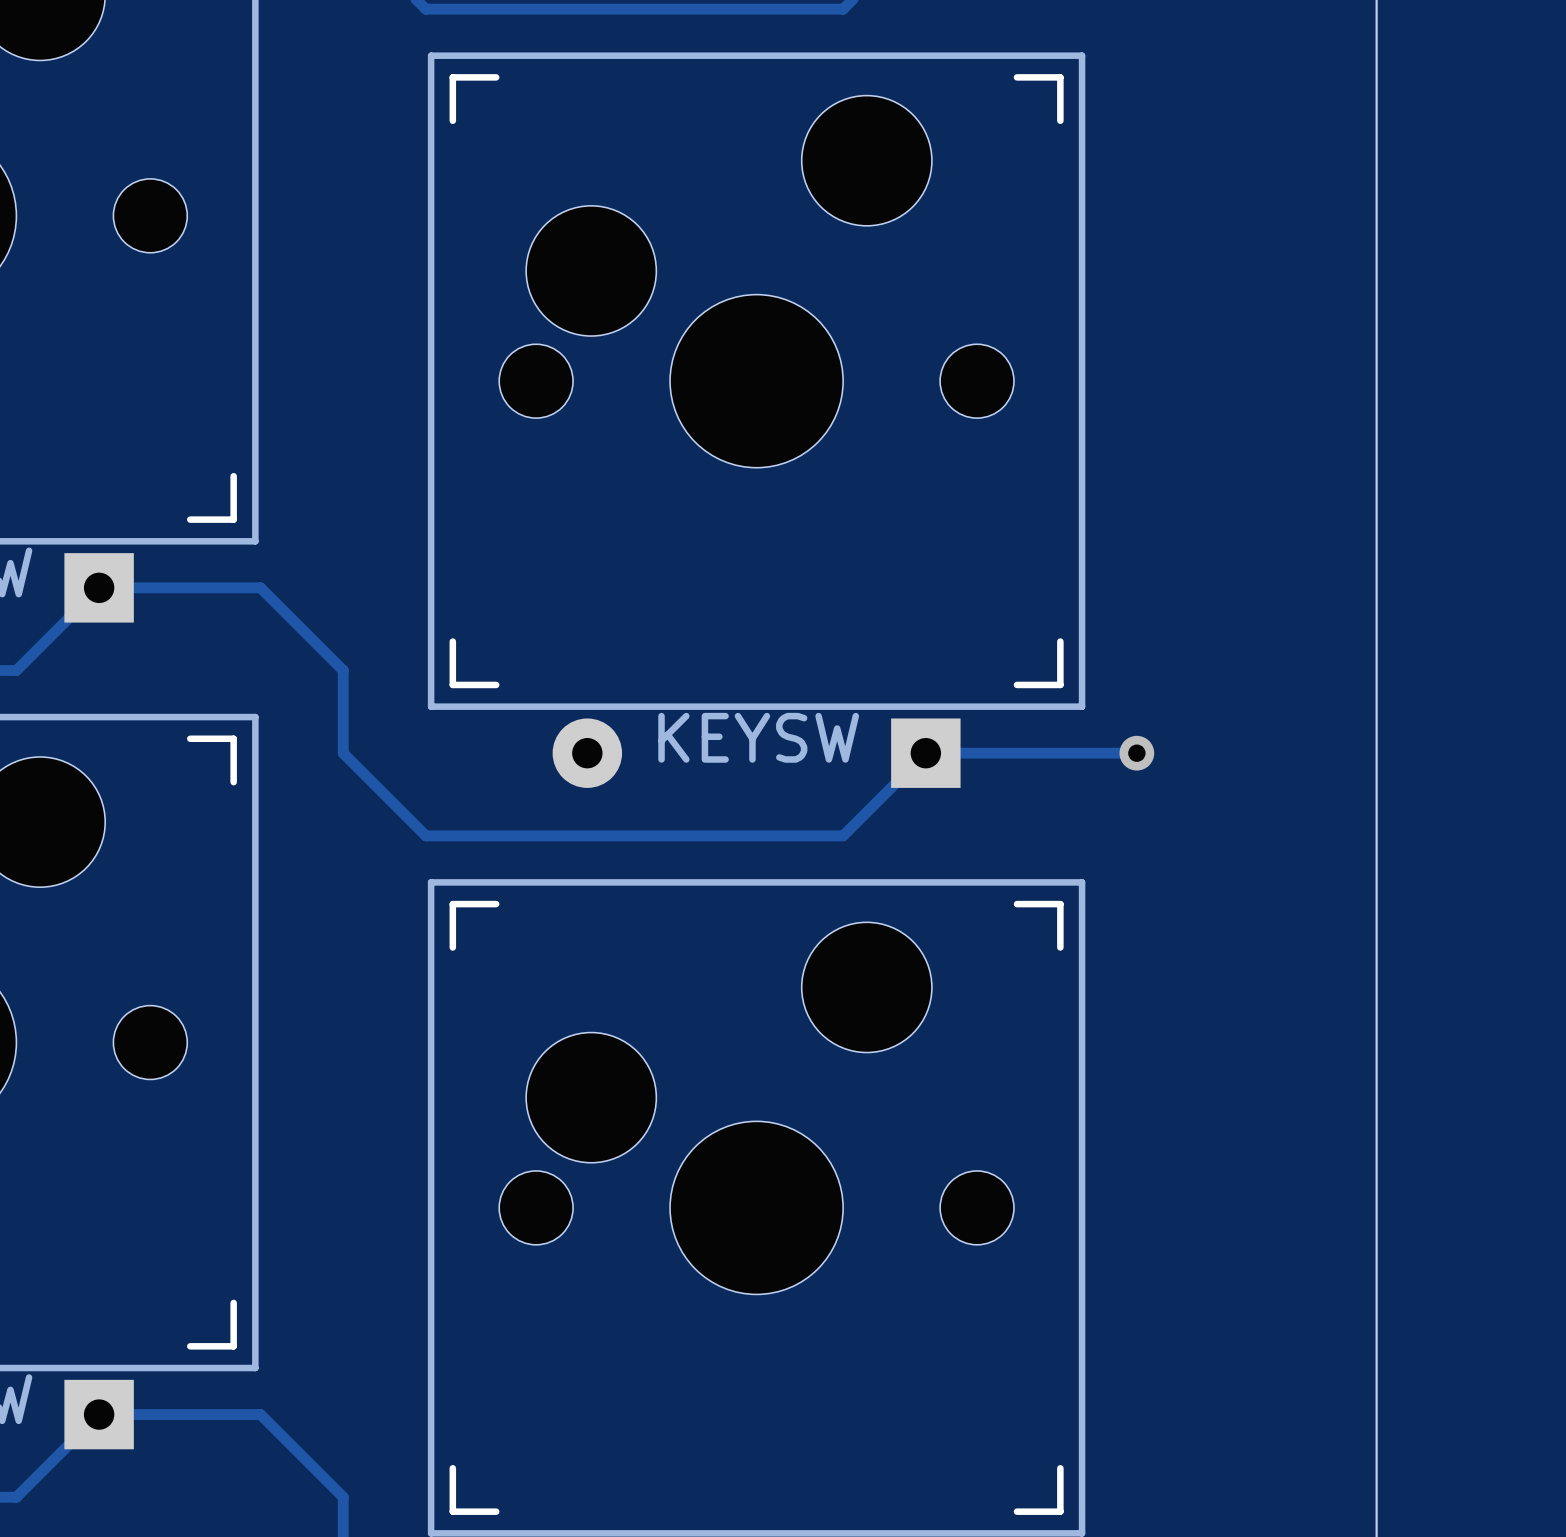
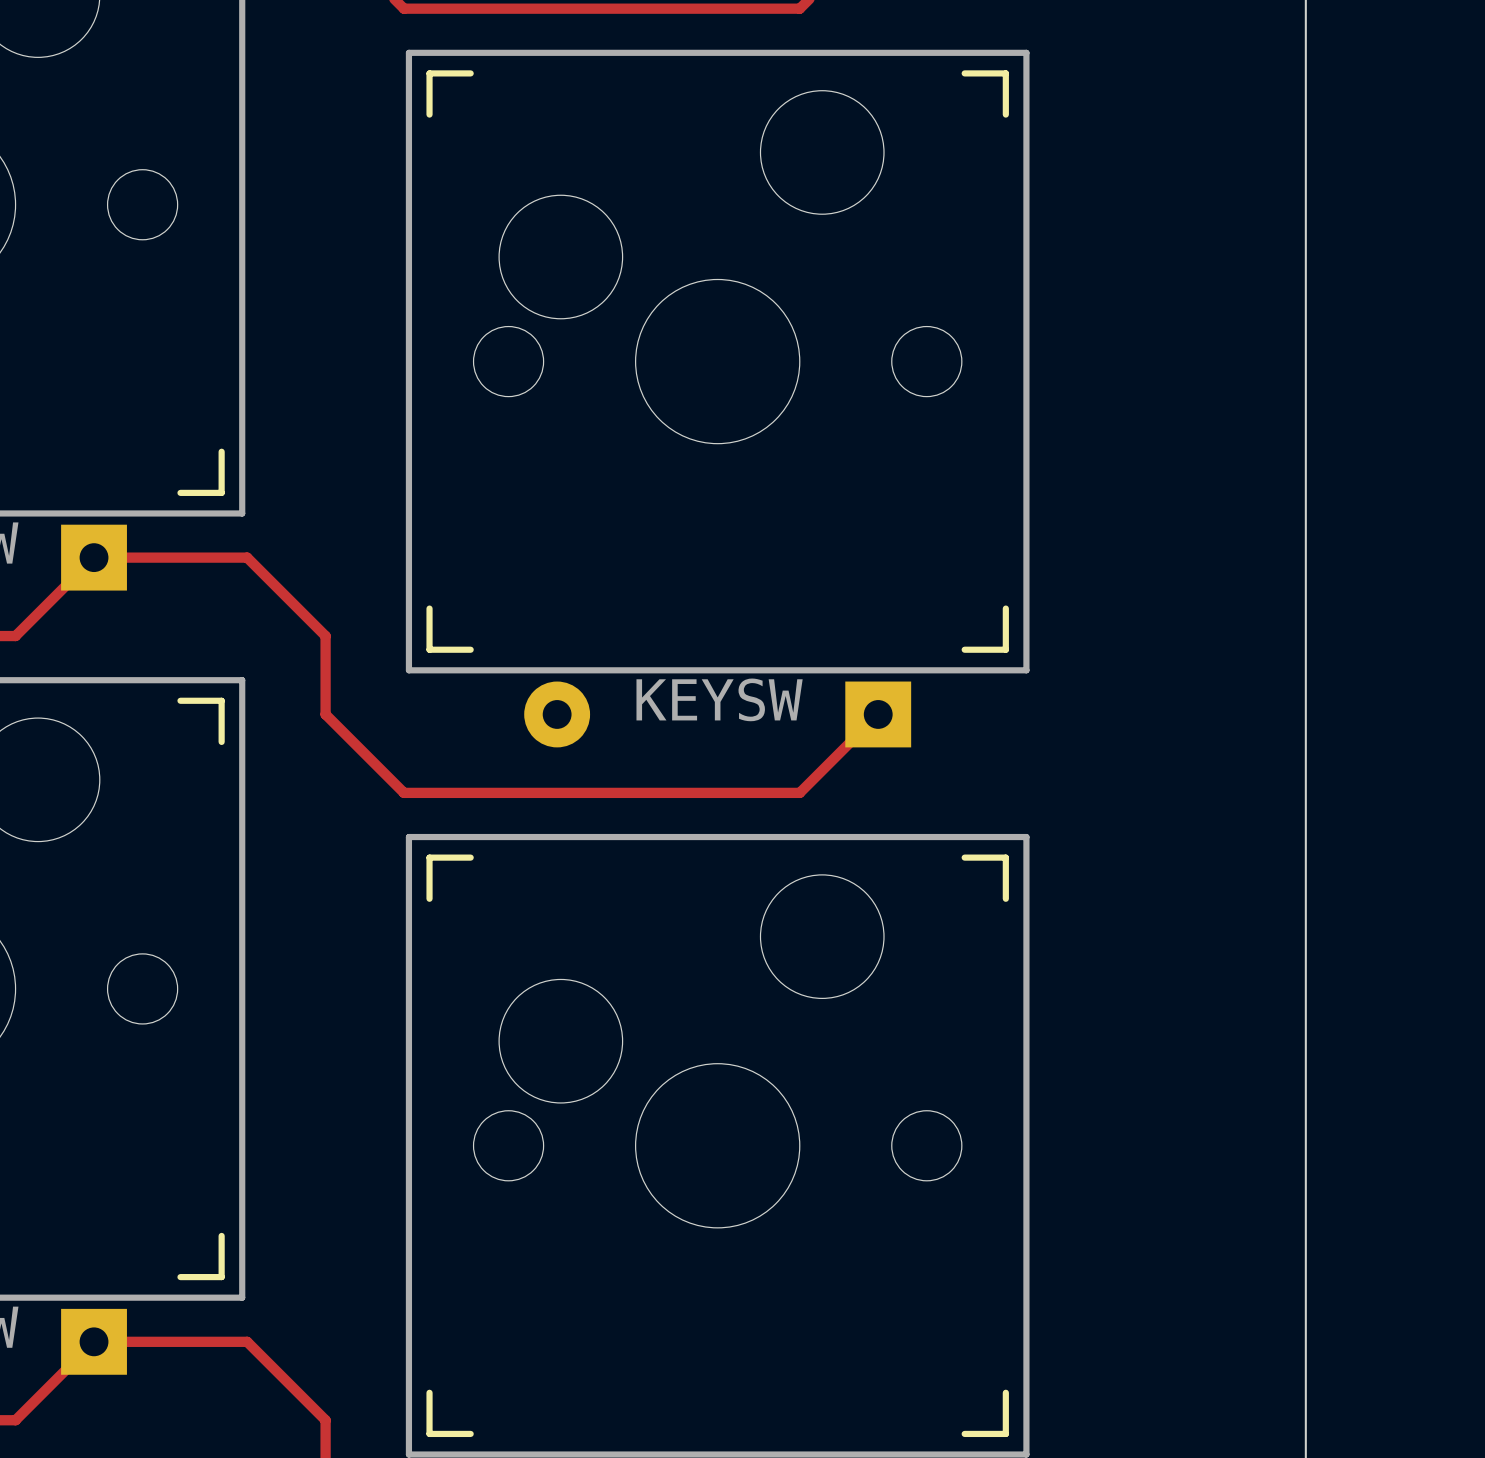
track: (925, 753) (1136, 753) -> none
via: (1136, 753) -> none

